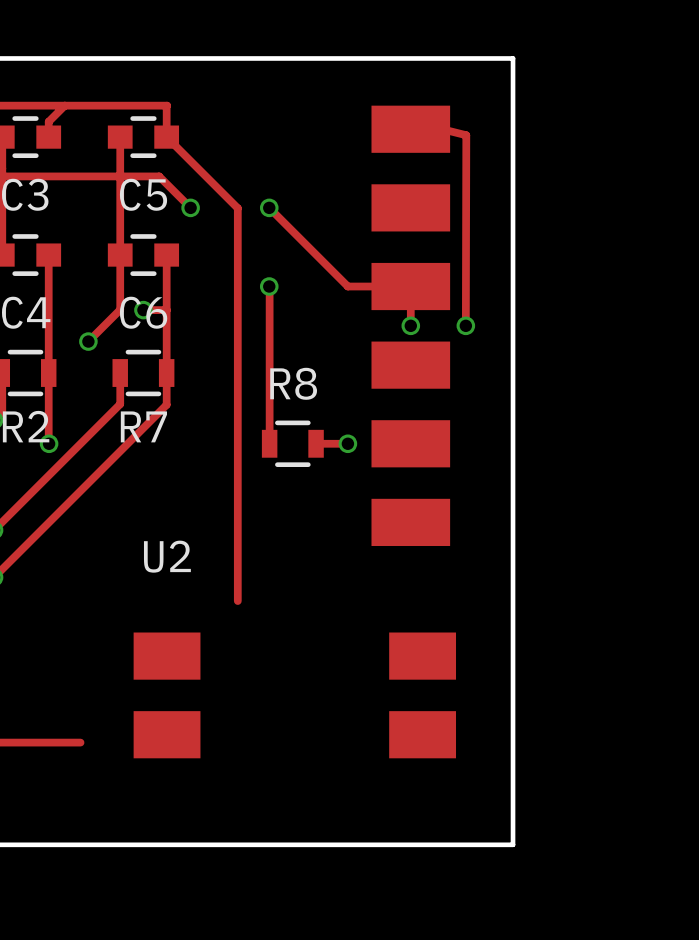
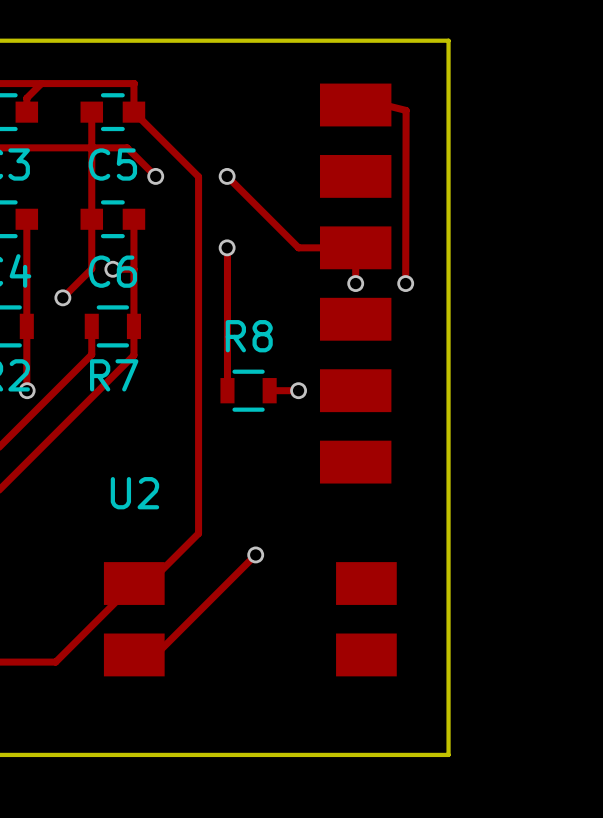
track: none -> (198, 533) (148, 583)
track: none -> (255, 554) (155, 654)
via: none -> (255, 554)
track: none -> (134, 583) (55, 662)

